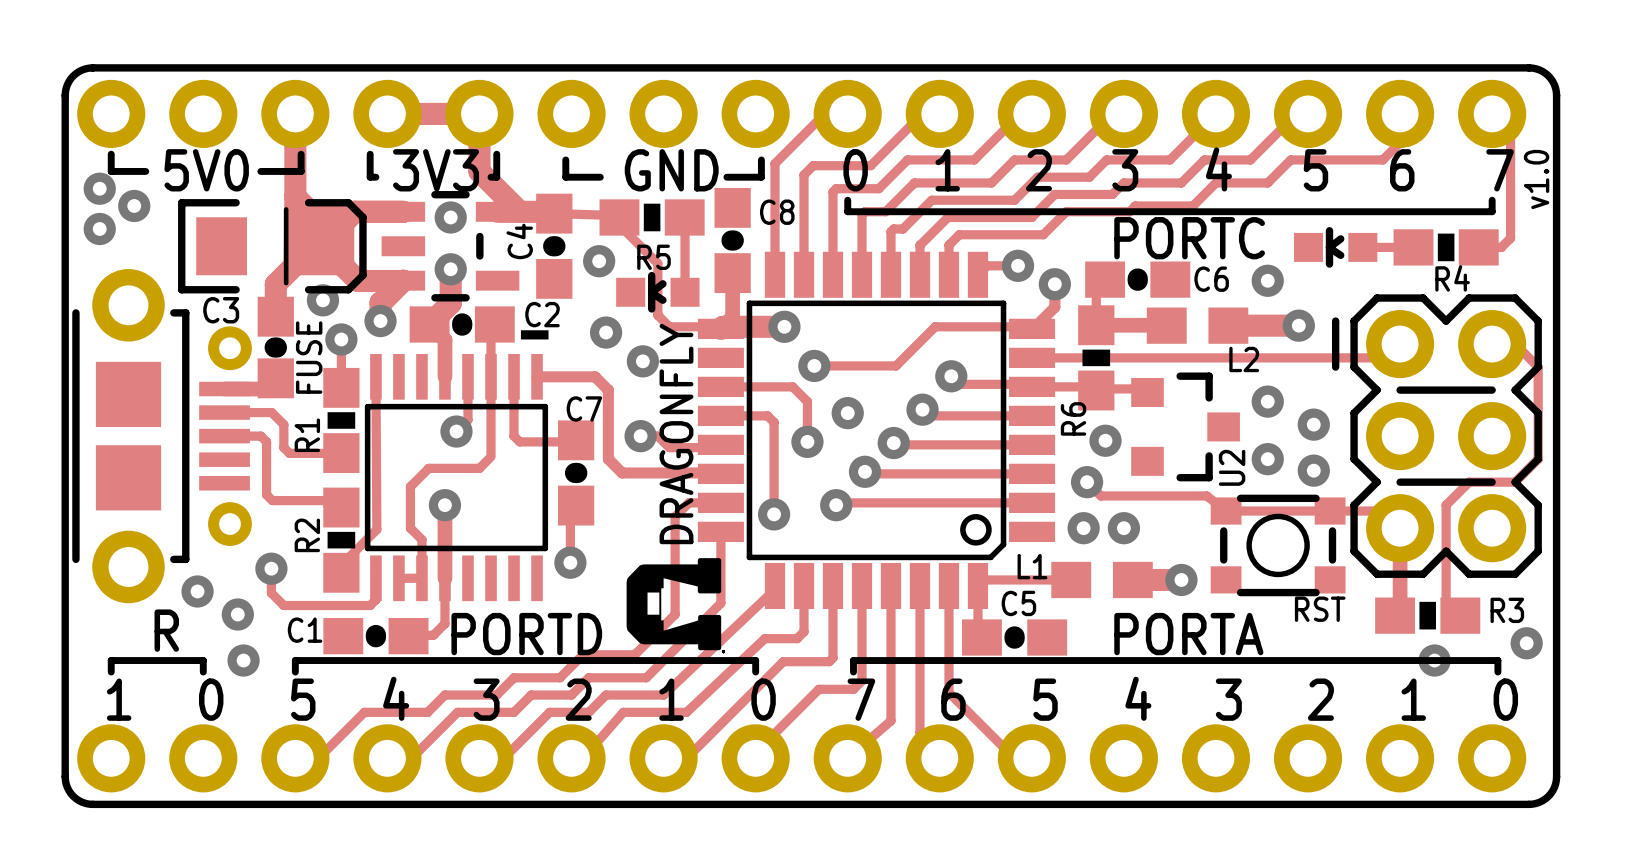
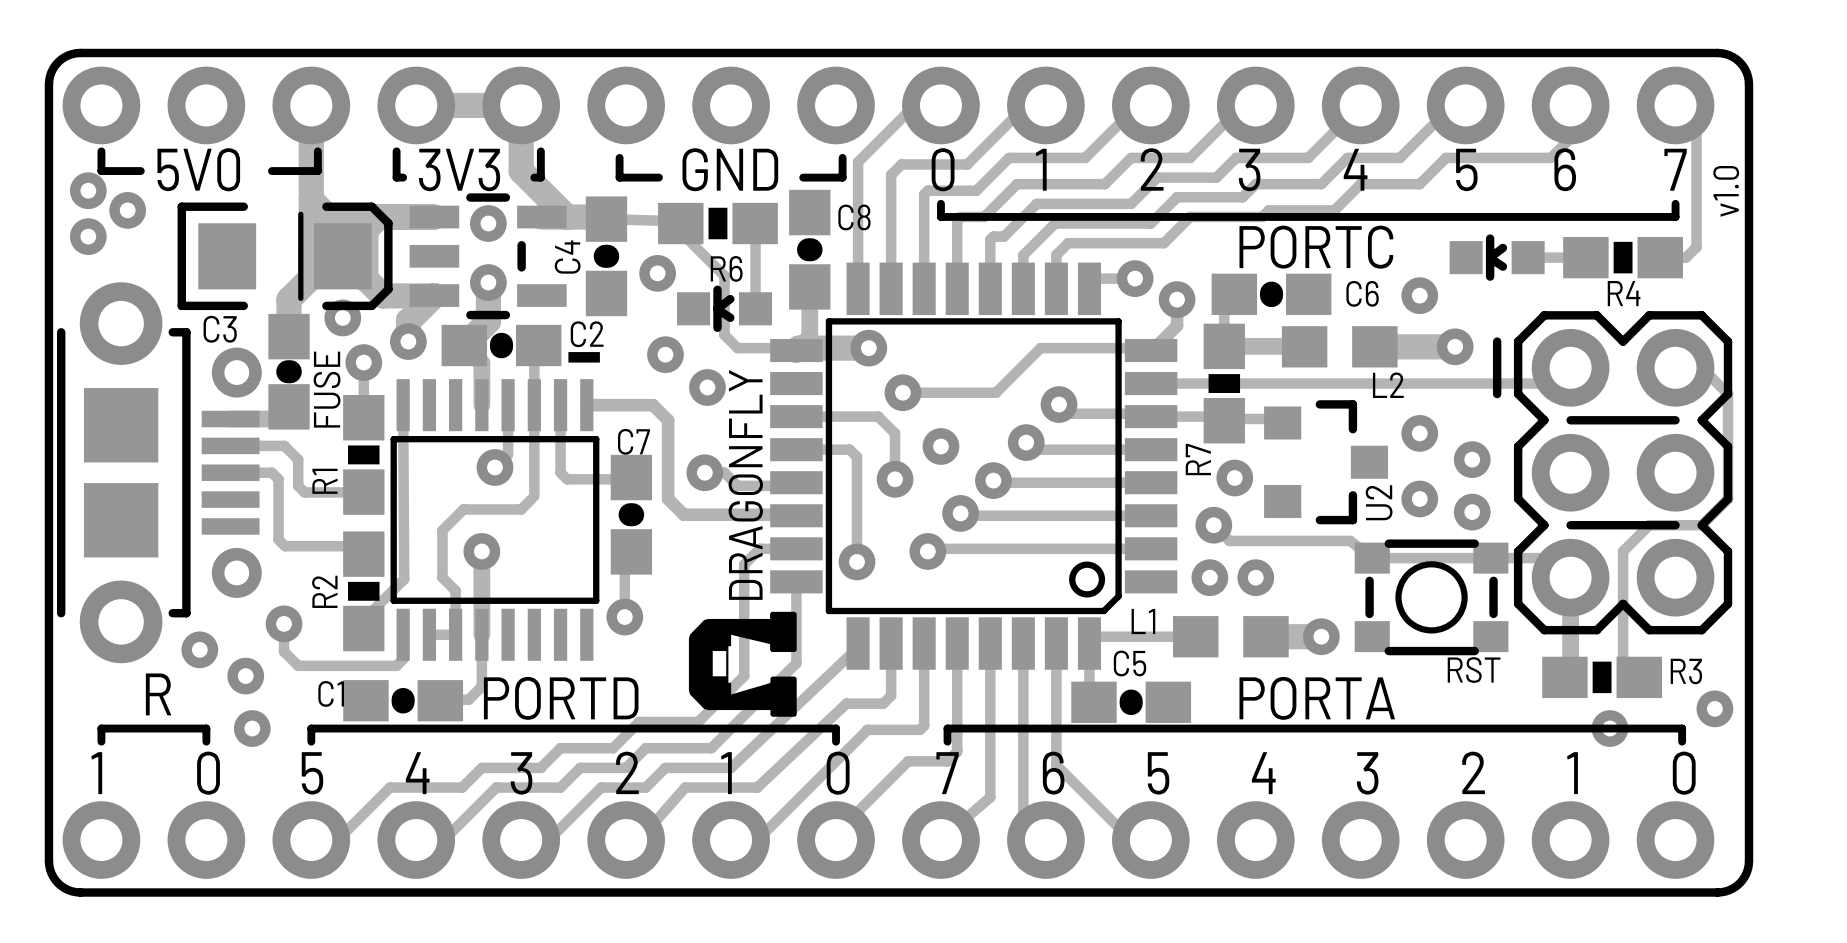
R5 name: R5 (653, 257) -> R6 (726, 268)
R6 name: R6 (1073, 418) -> R7 (1198, 459)

